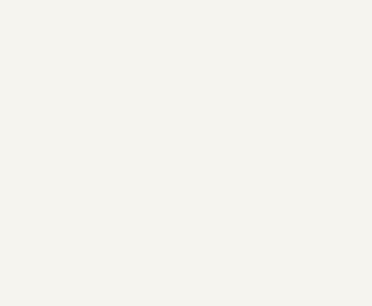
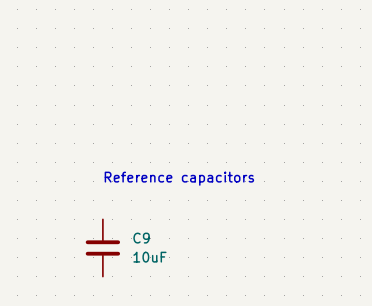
text: none -> Reference capacitors (179, 178)
C9: none -> 10uF (102, 247)

